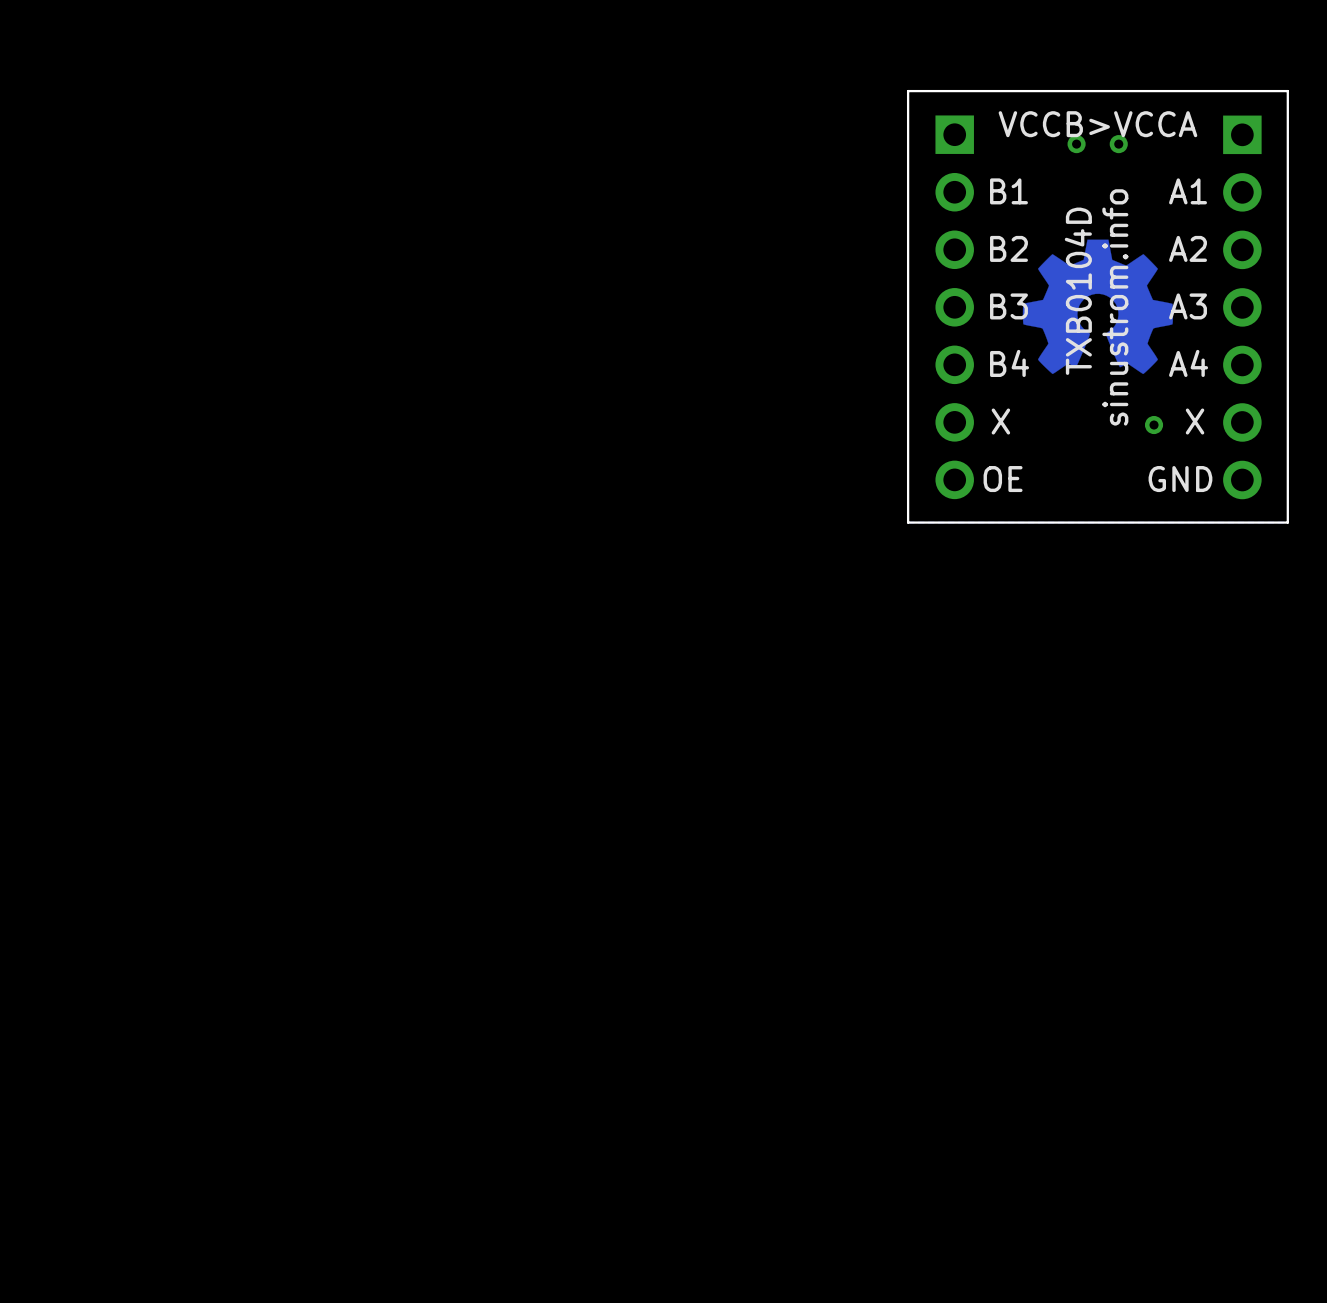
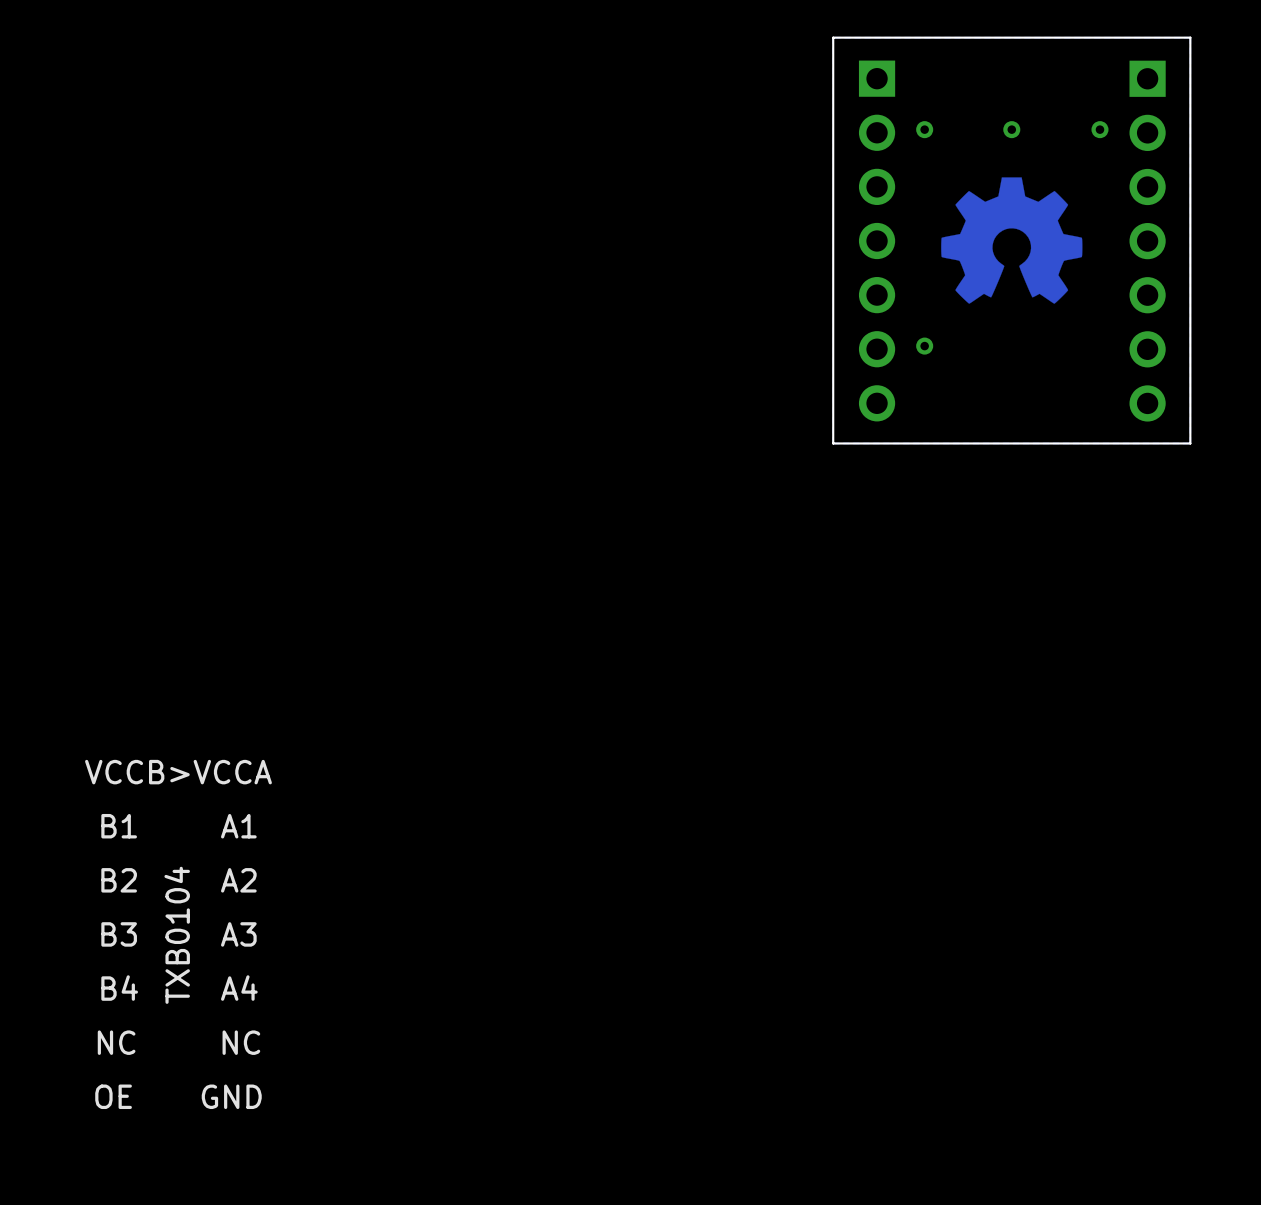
text: VCCB>VCCA (1097, 124) -> none
via: (1076, 144) -> none
via: (1118, 144) -> none
via: none -> (924, 129)
via: none -> (1011, 129)
via: none -> (1099, 129)
text: B1 A1 (1098, 191) -> none
text: B2 A2 (1098, 248) -> none
text: TXB0104D (1078, 291) -> none
text: B3 A3 (1098, 306) -> none
text: sinustrom.info (1115, 307) -> none
text: B4 A4 (1099, 363) -> none
via: none -> (924, 346)
text: X X (1097, 421) -> none
via: (1154, 425) -> none
text: OE GND (1097, 479) -> none
text: none -> VCCB>VCCA (178, 772)
text: none -> B1 A1 (178, 826)
text: none -> B2 A2 (178, 880)
text: none -> B3 A3 (178, 934)
text: none -> TXB0104 (177, 935)
text: none -> B4 A4 (179, 988)
text: none -> NC NC (178, 1042)
text: none -> OE GND (178, 1096)

